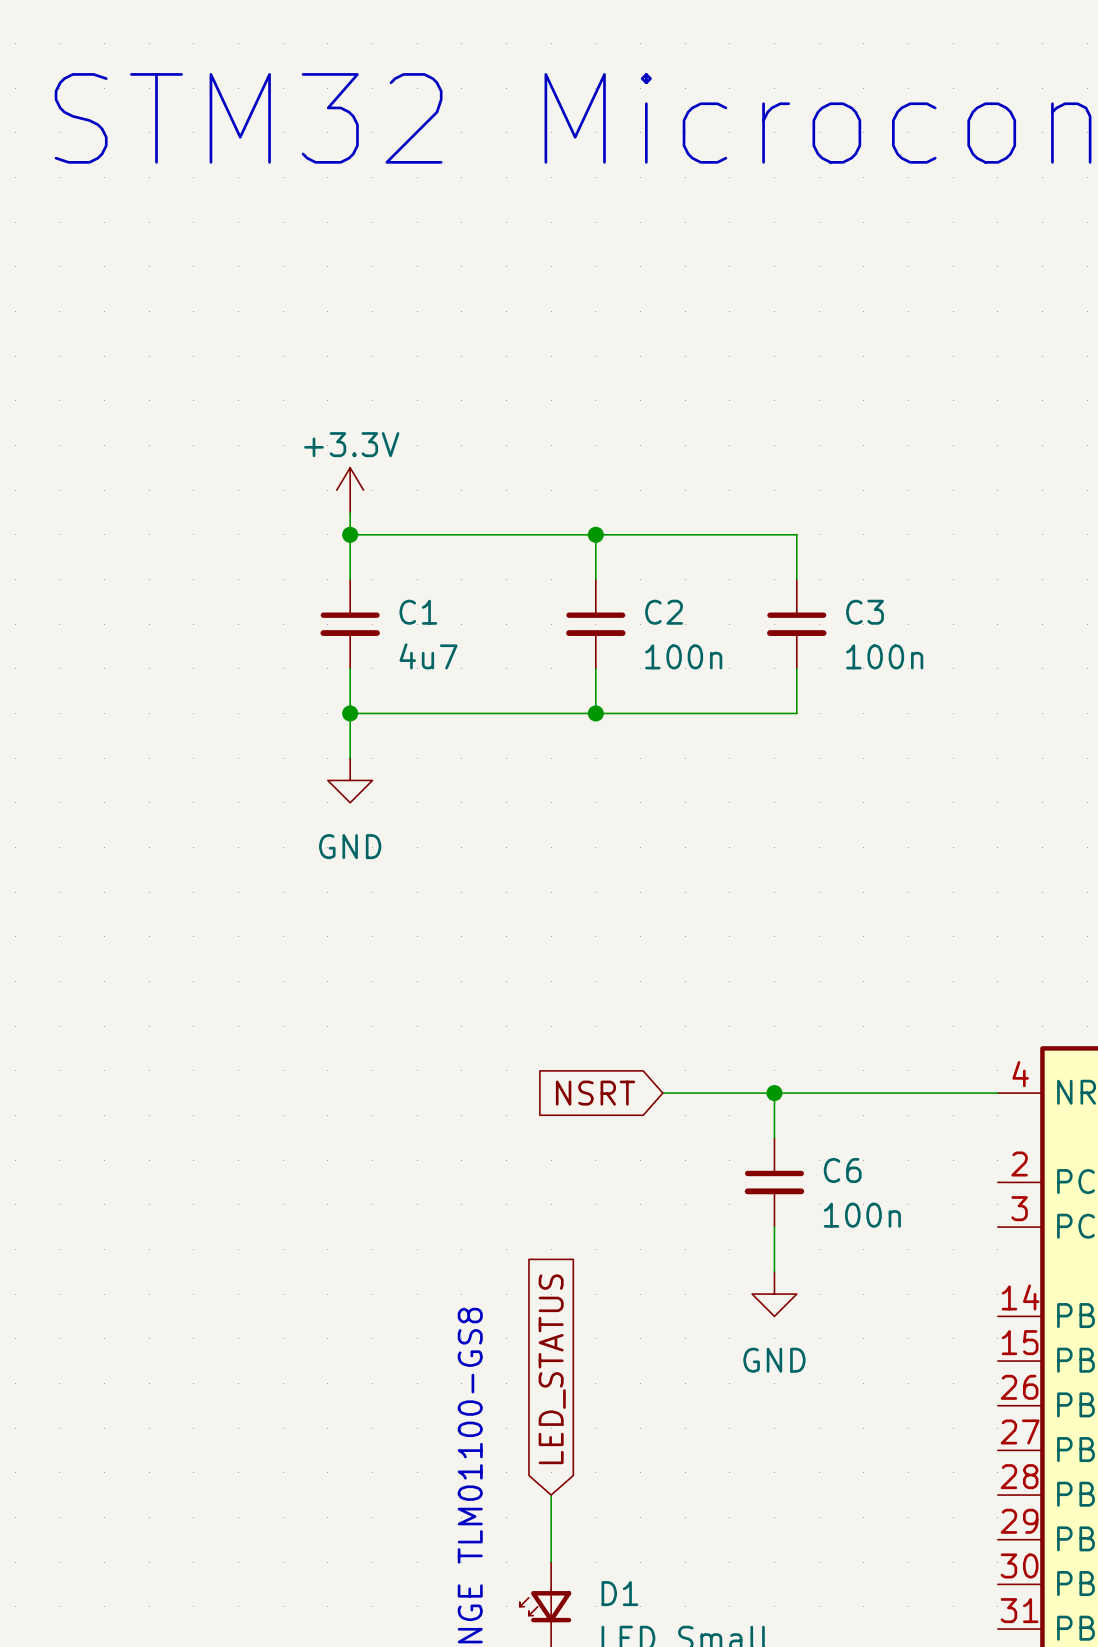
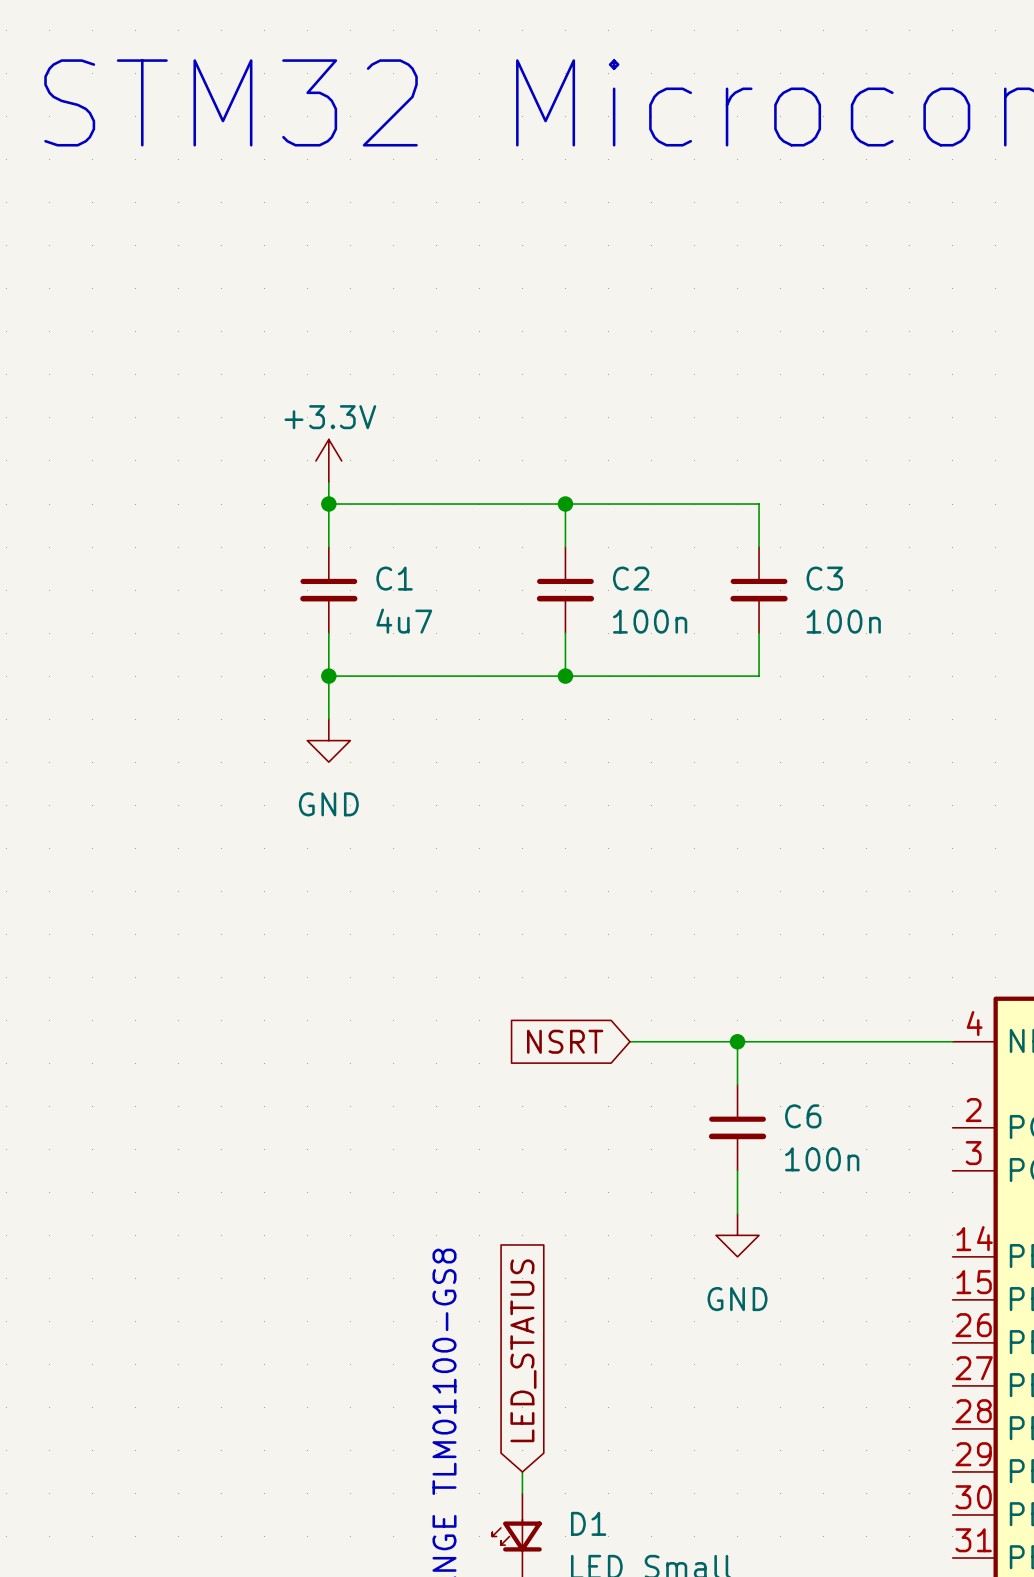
global label position: LED_STATUS (552, 1369) -> LED_STATUS (523, 1350)
wire: (551, 1495) (551, 1539) -> none

